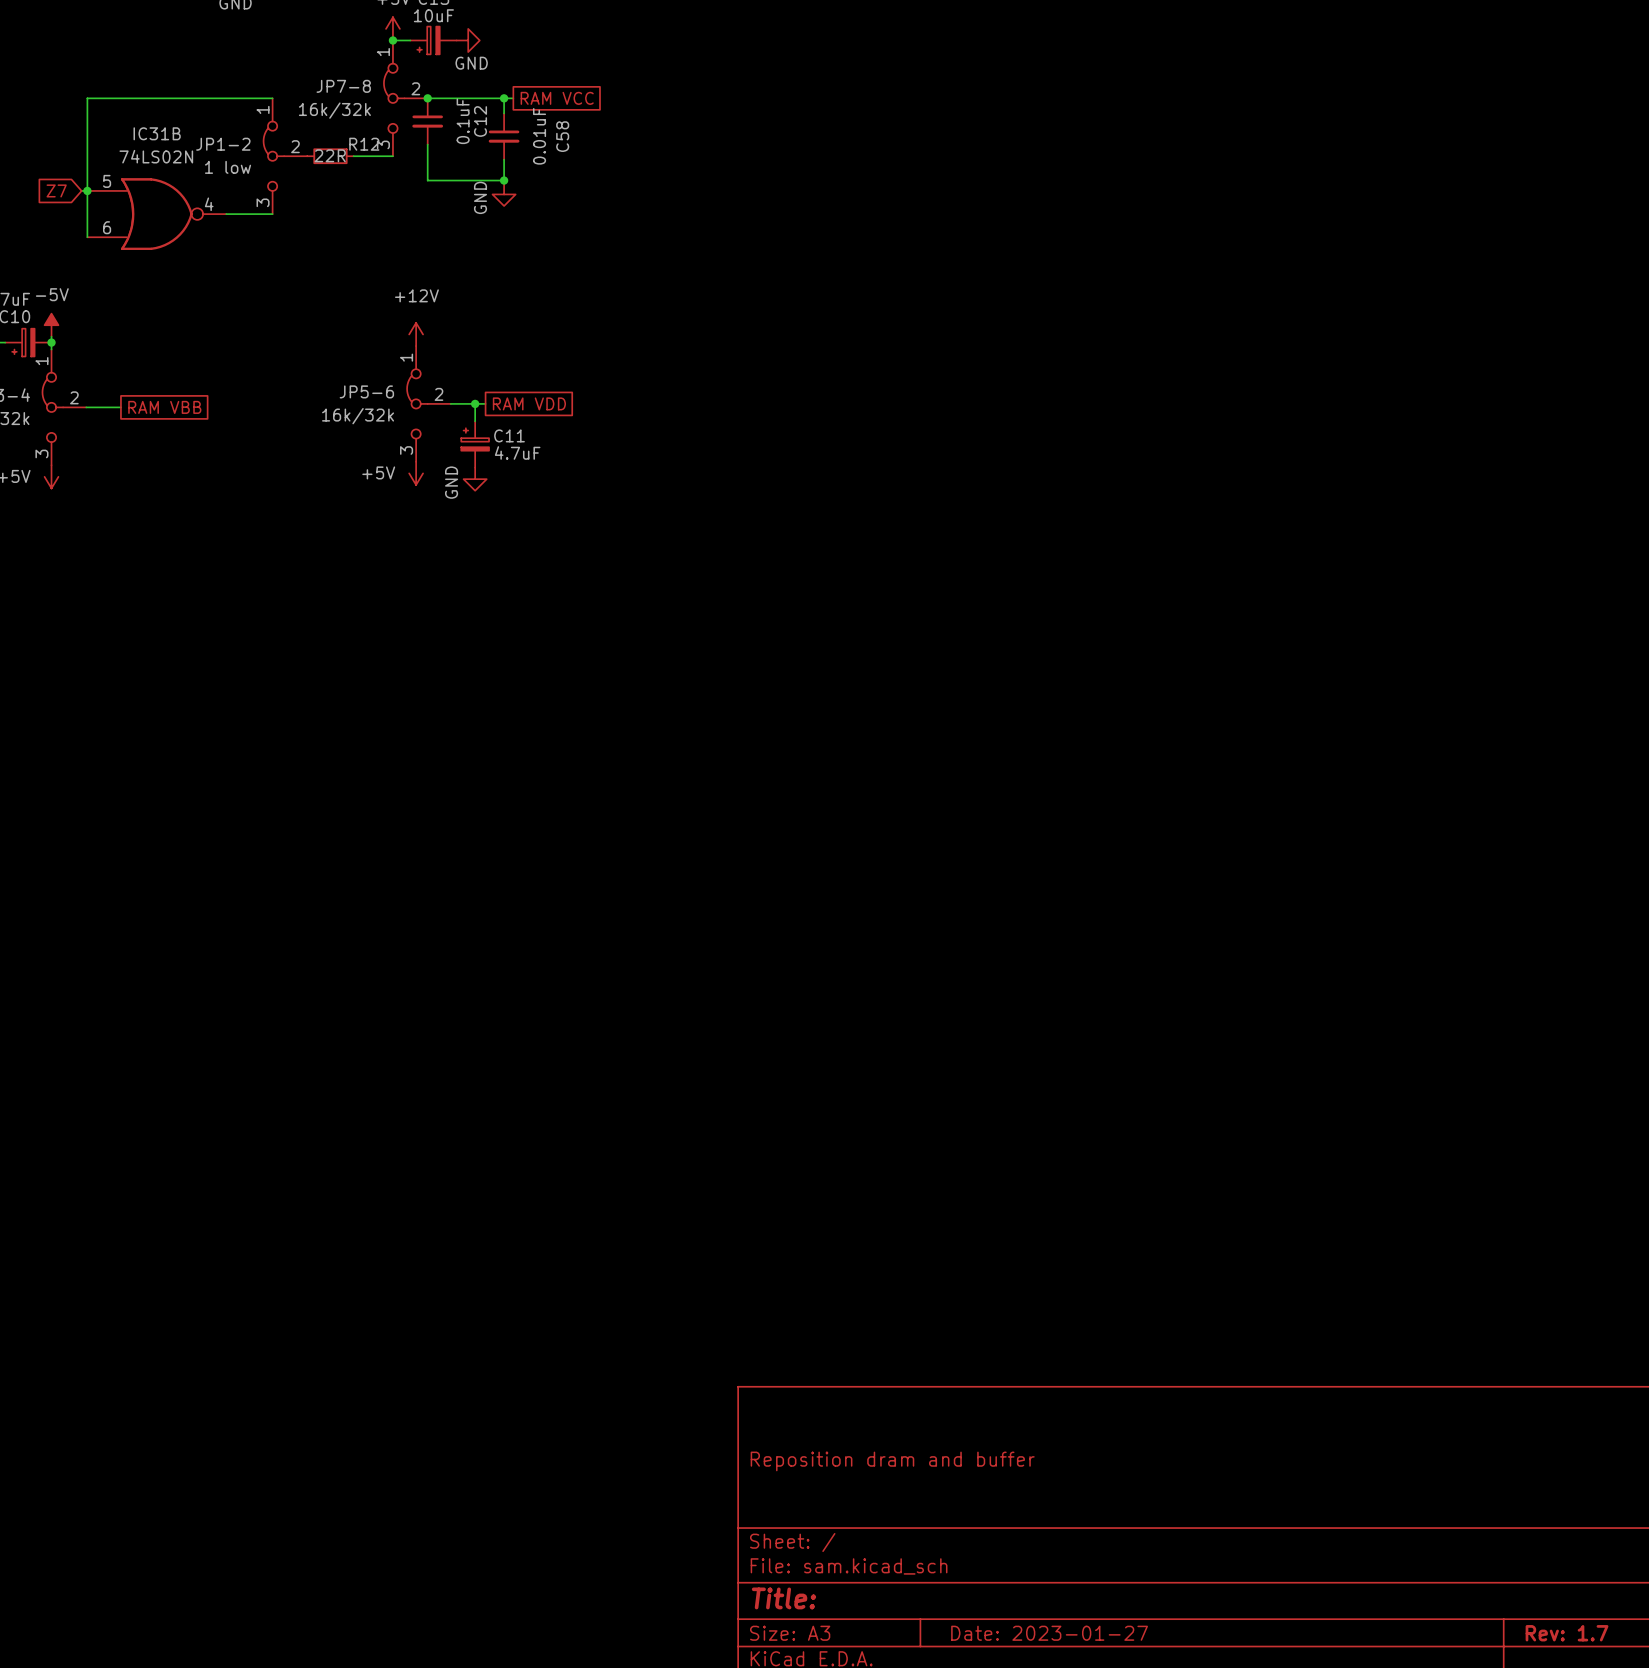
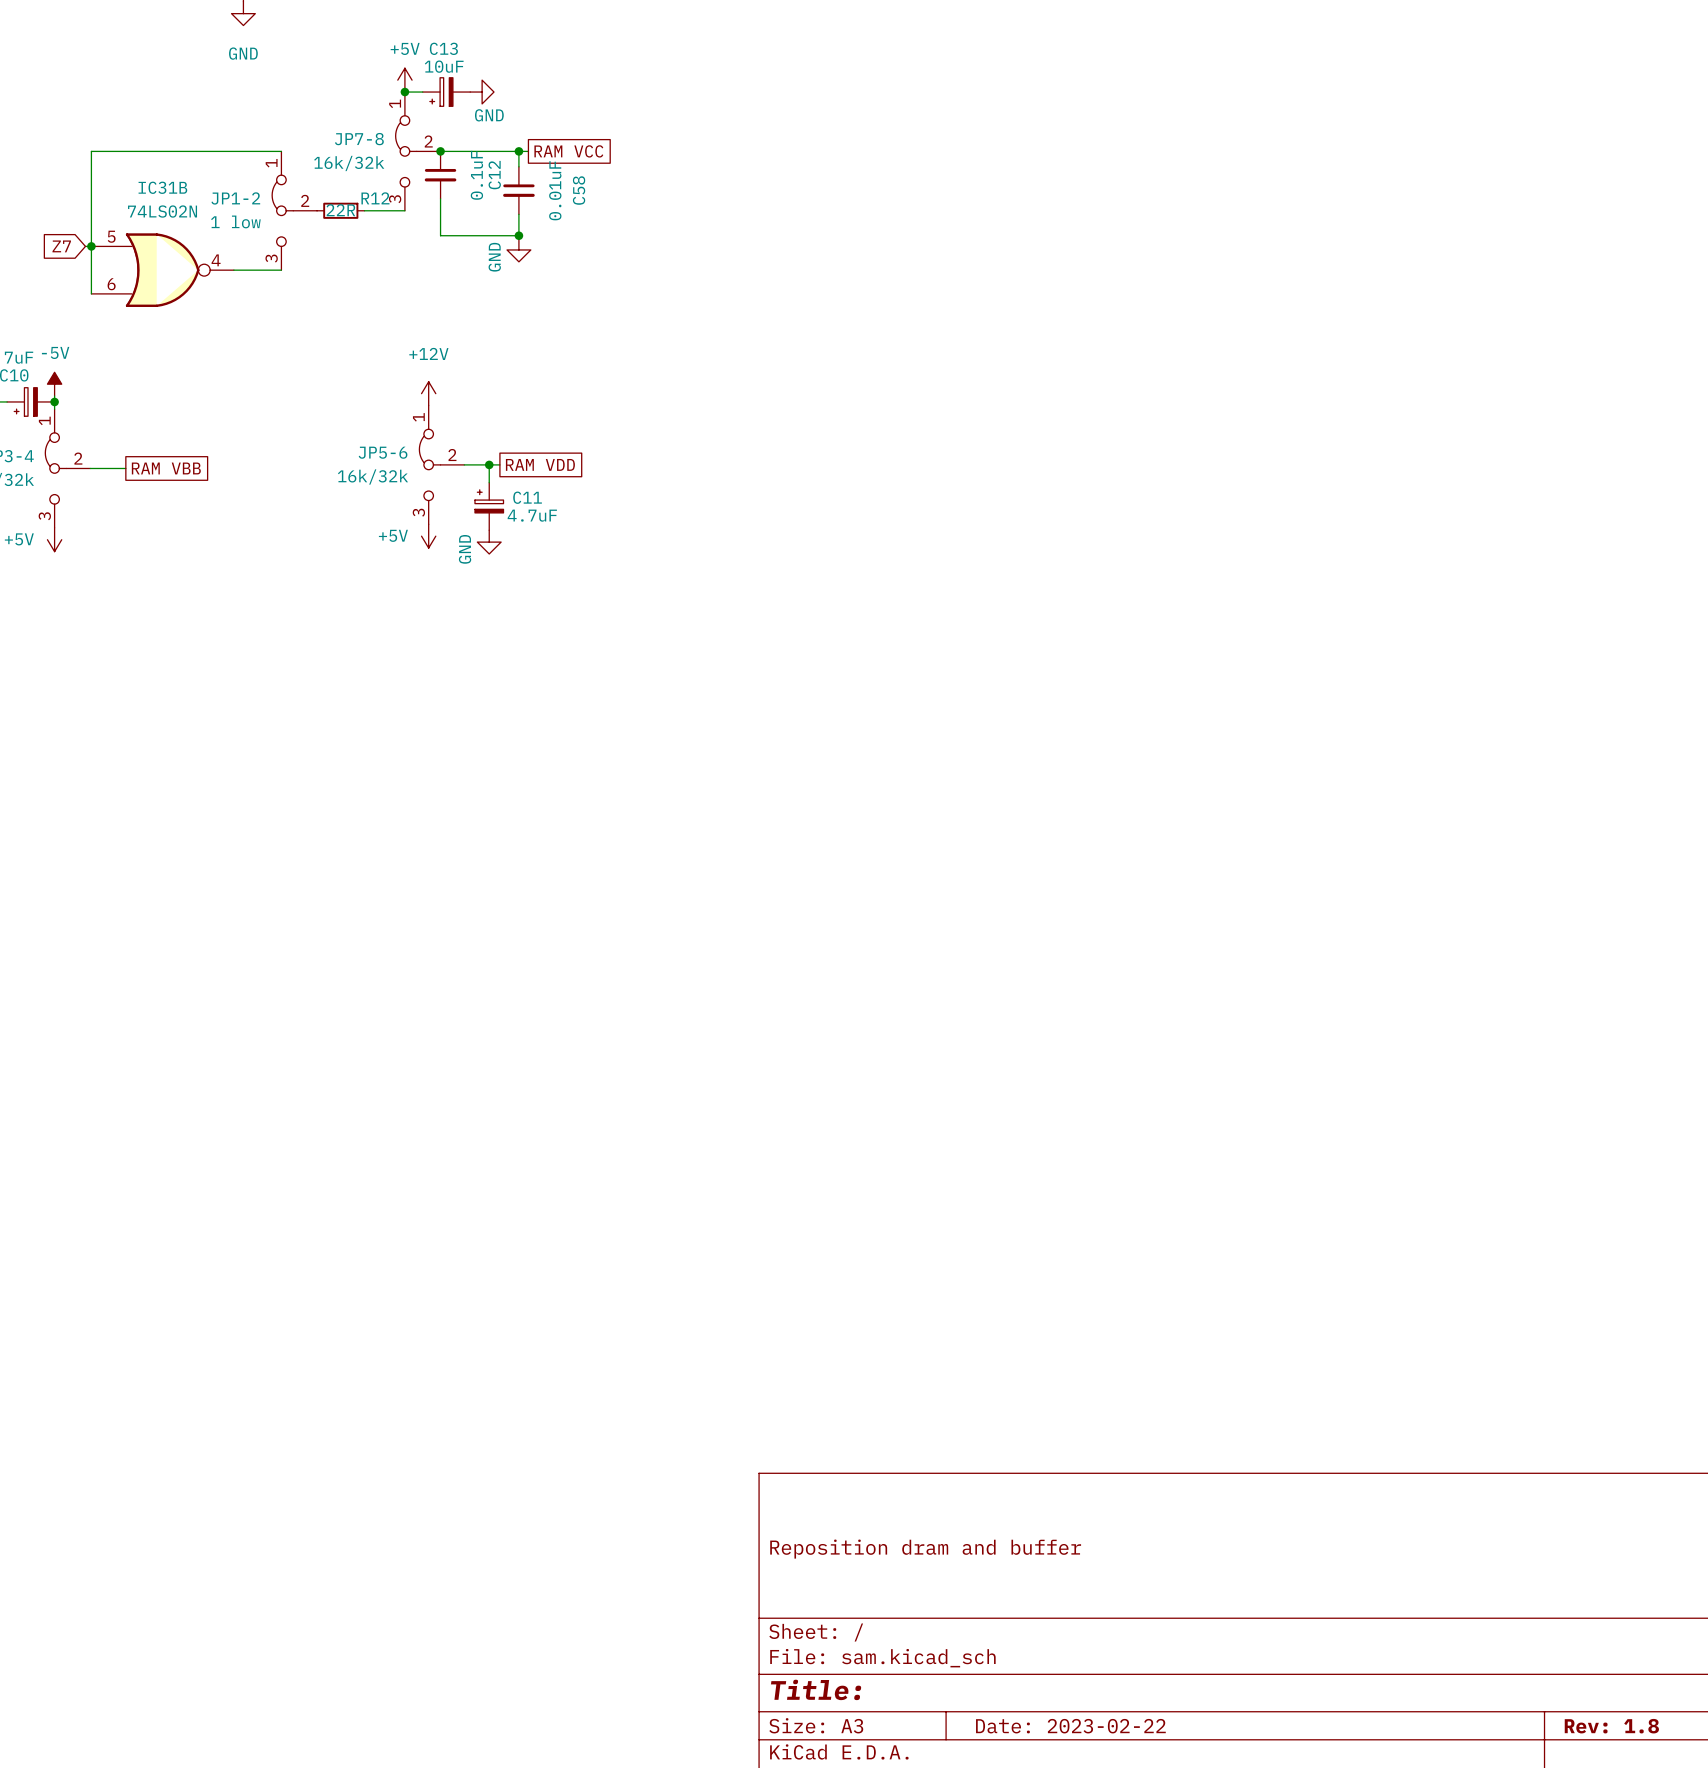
title block: Date: 2023-01-27 (1049, 1633) -> Date: 2023-02-22 (1070, 1726)
title block: Rev: 1.7 (1567, 1633) -> Rev: 1.8 (1611, 1726)

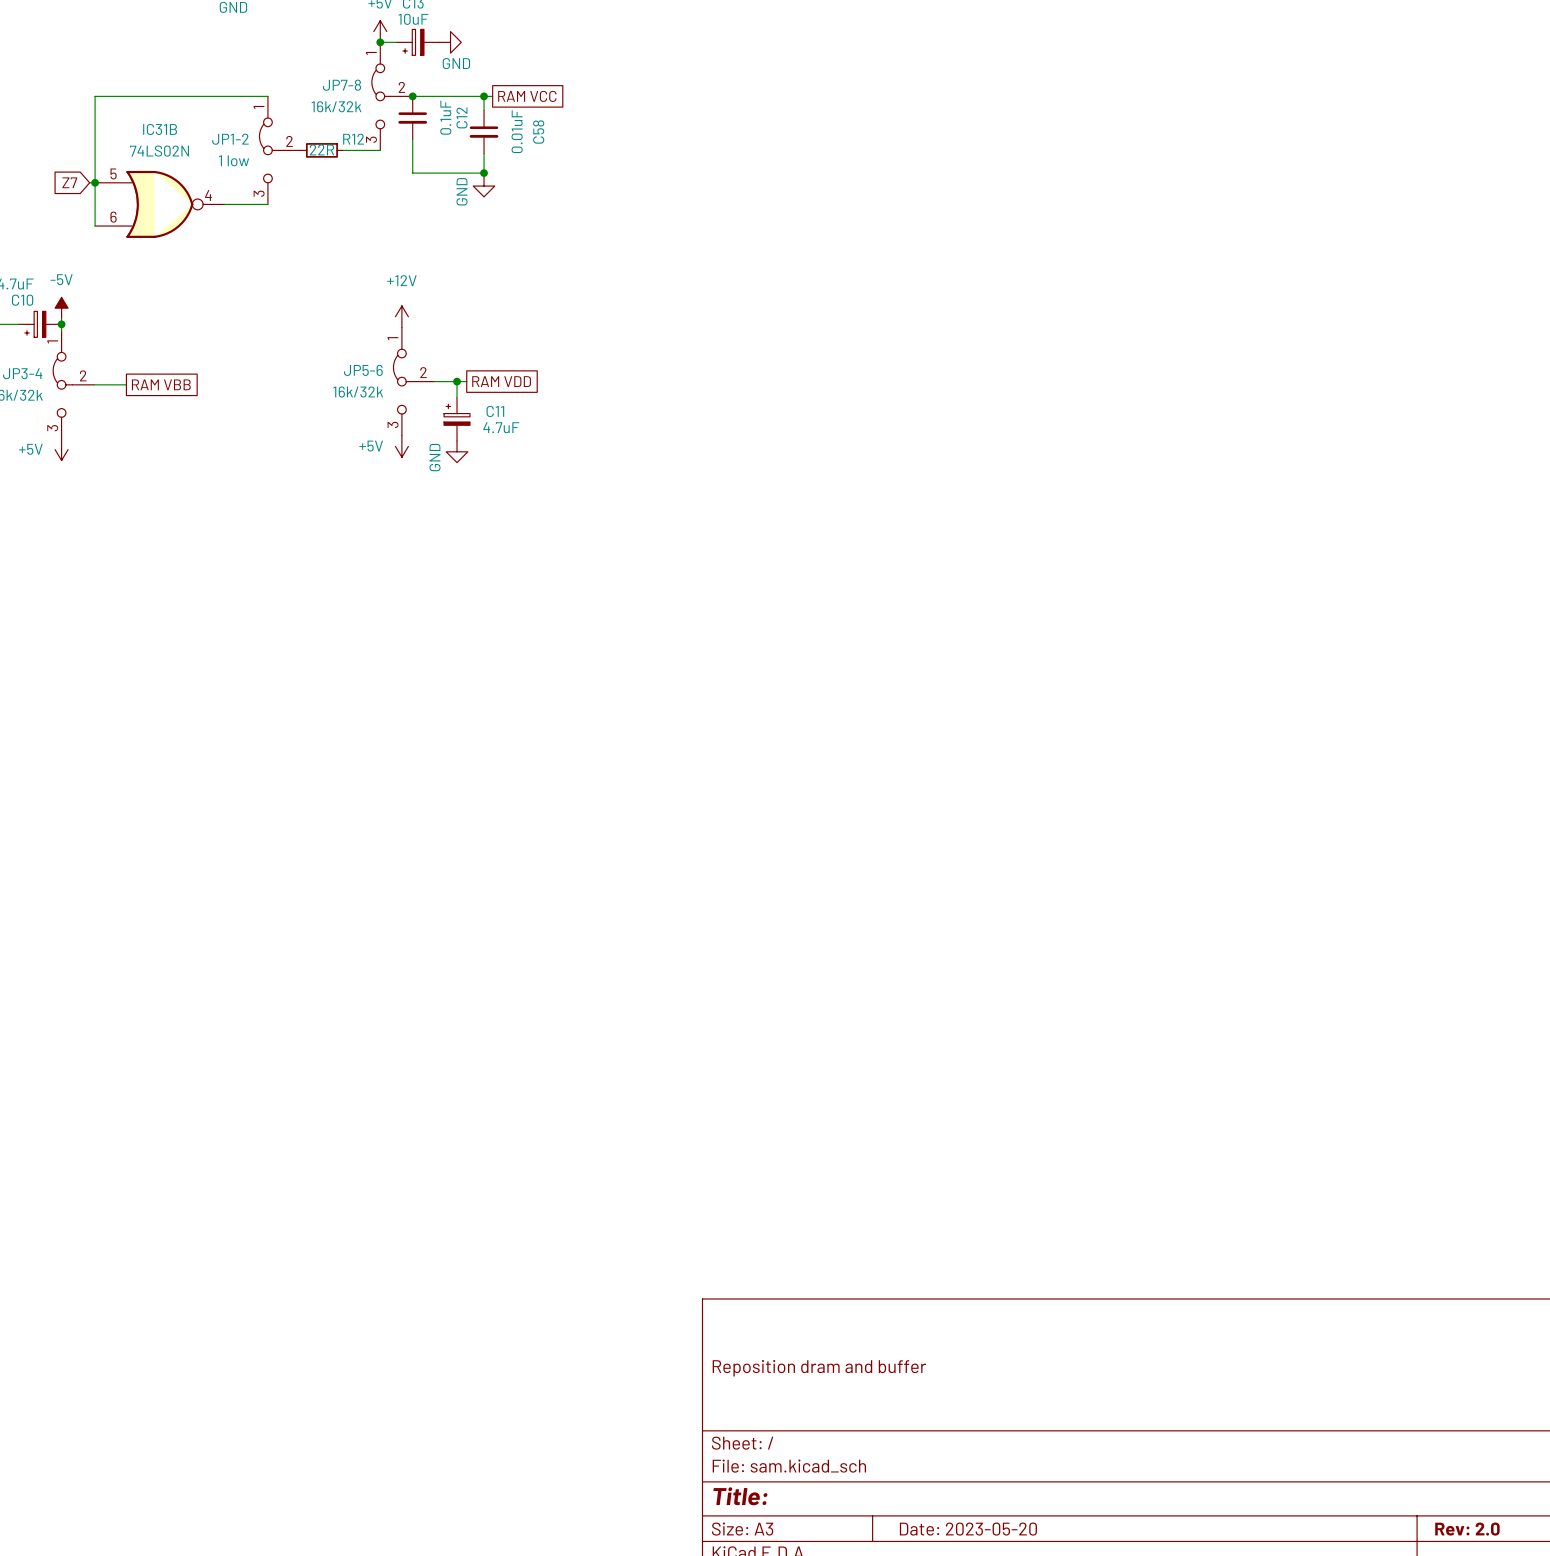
title block: Date: 2023-02-22 (1070, 1726) -> Date: 2023-05-20 (968, 1529)
title block: Rev: 1.8 (1611, 1726) -> Rev: 2.0 (1467, 1529)

